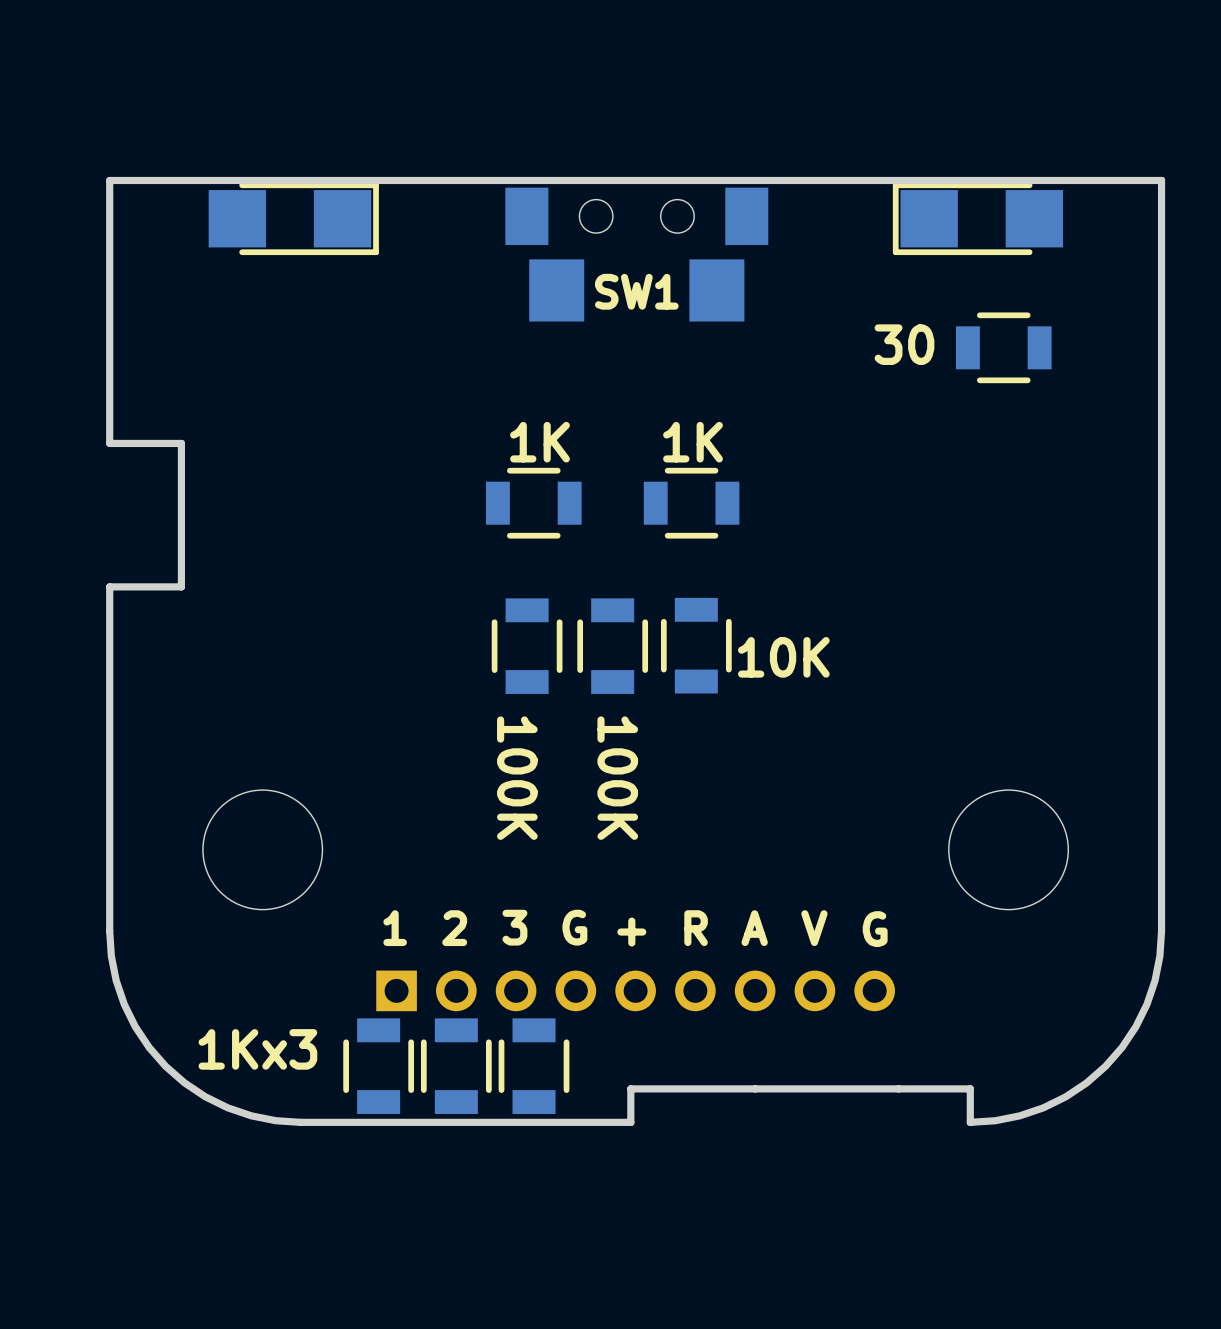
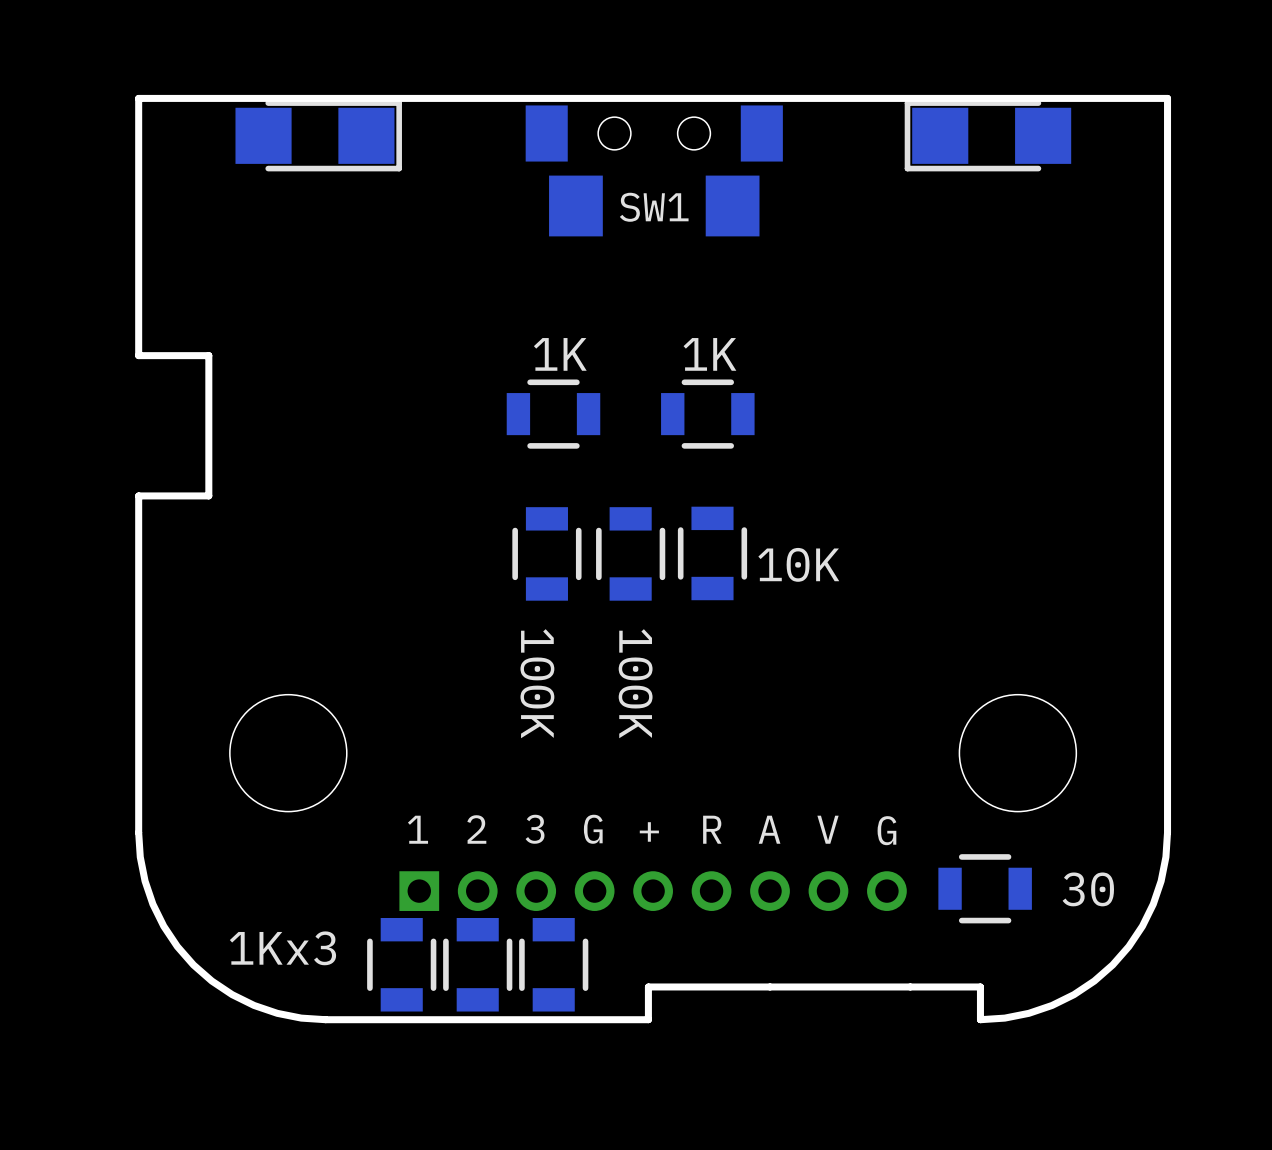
text position: 30 (904, 344) -> 30 (1088, 889)
part position: (1003, 347) -> (985, 888)

